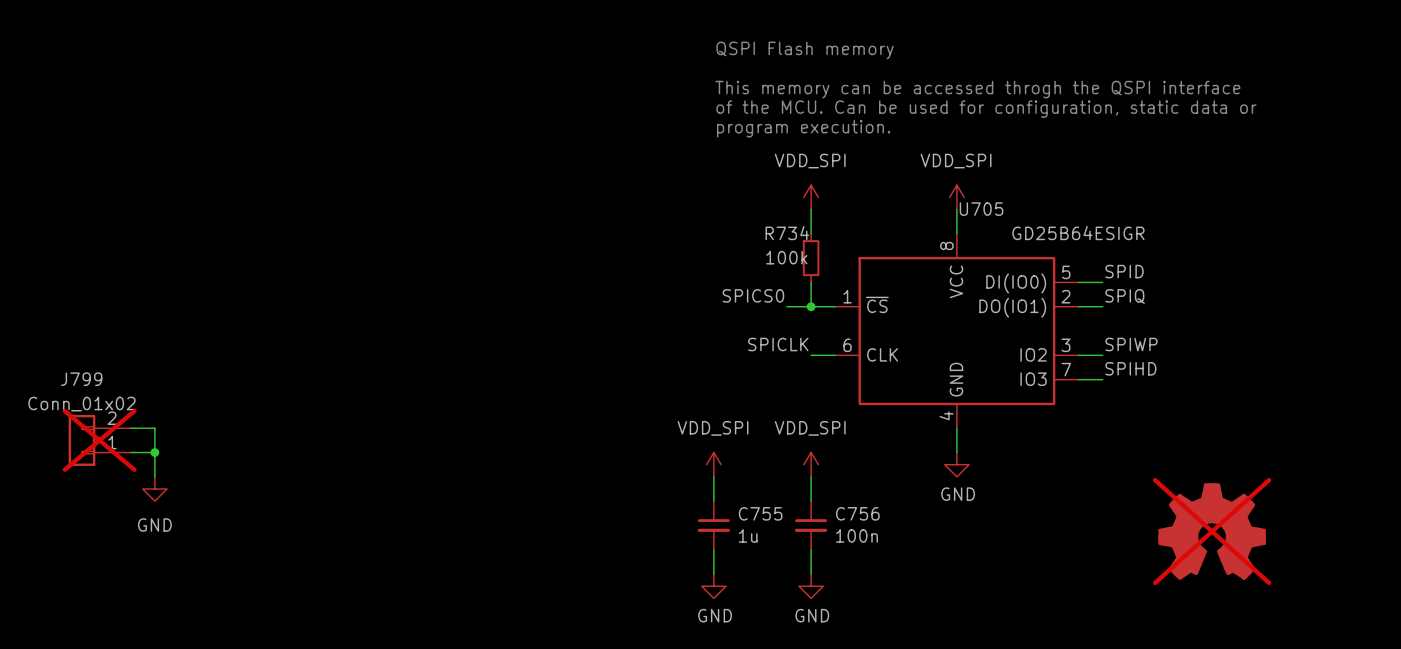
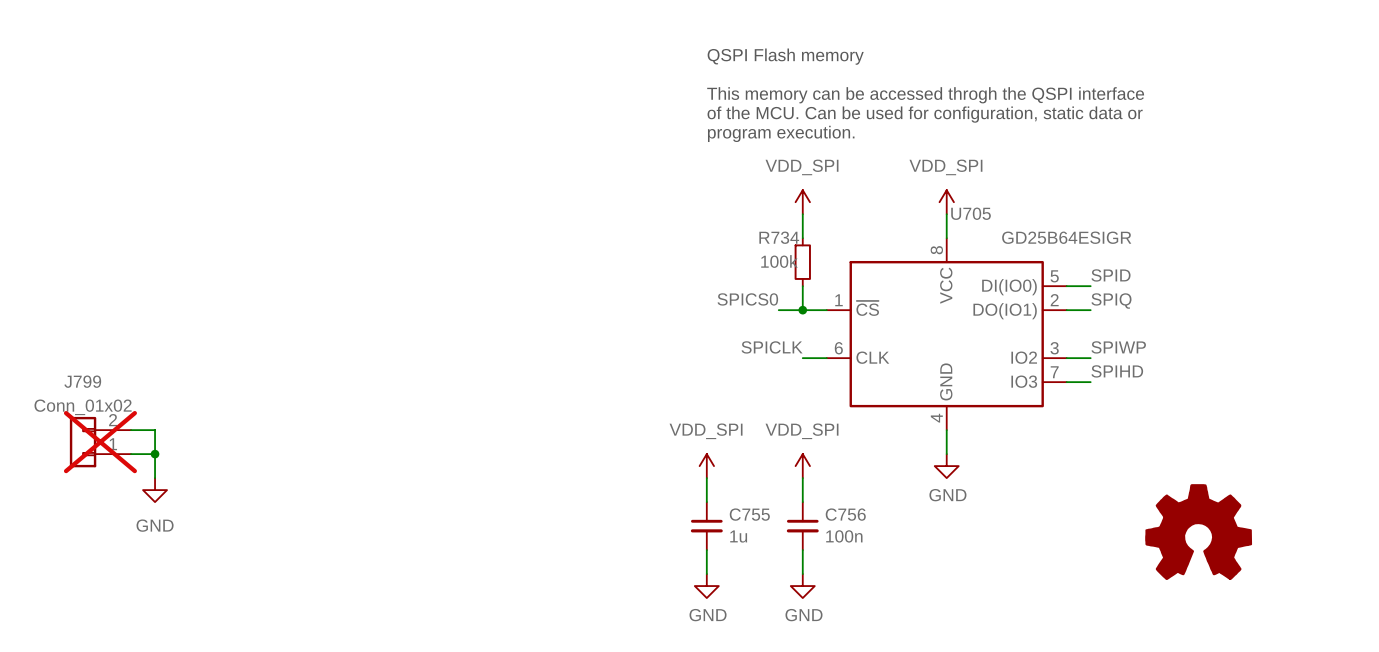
part do-not-place cross: (1212, 531) -> none

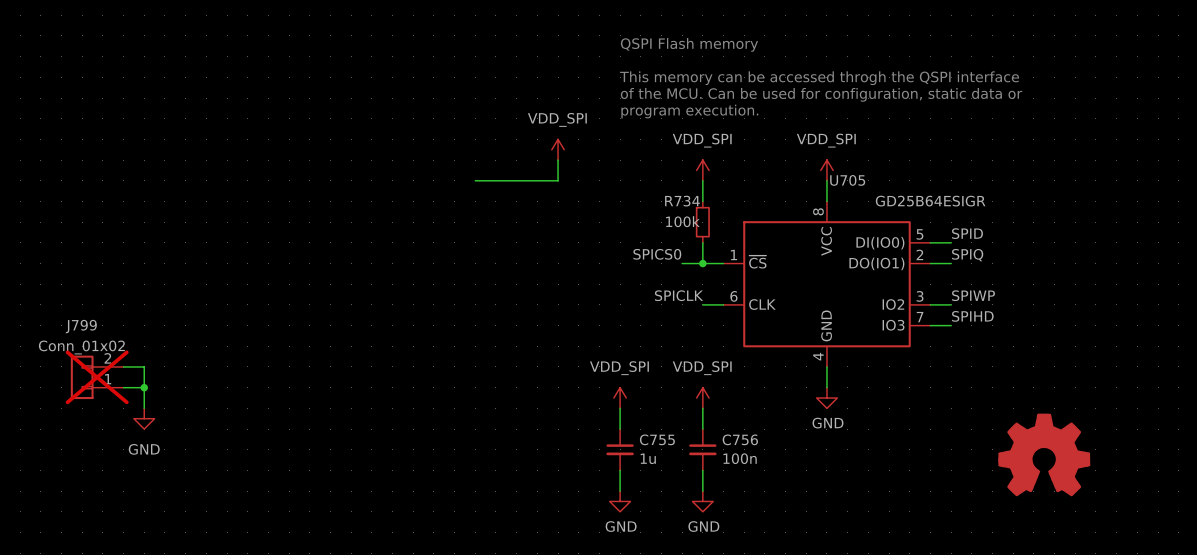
power symbol: none -> VDD_SPI (558, 149)
wire: none -> (558, 160) (558, 180) (475, 180)

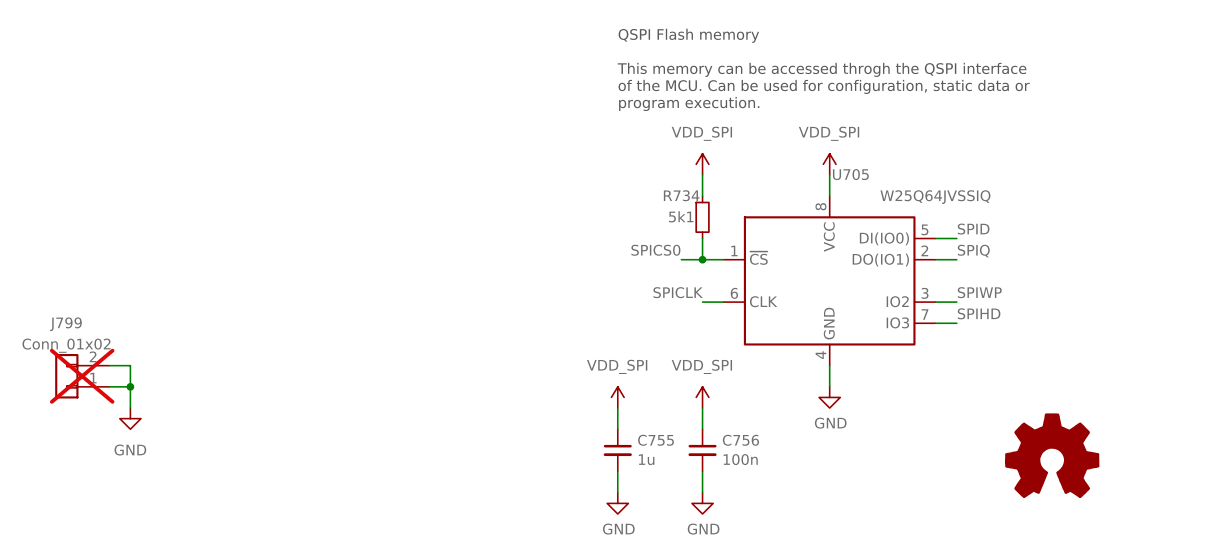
power symbol: VDD_SPI (558, 149) -> none
wire: (558, 160) (558, 180) (475, 180) -> none
U705 value: GD25B64ESIGR (930, 201) -> W25Q64JVSSIQ (935, 197)
R734 value: 100k (682, 221) -> 5k1 (681, 216)

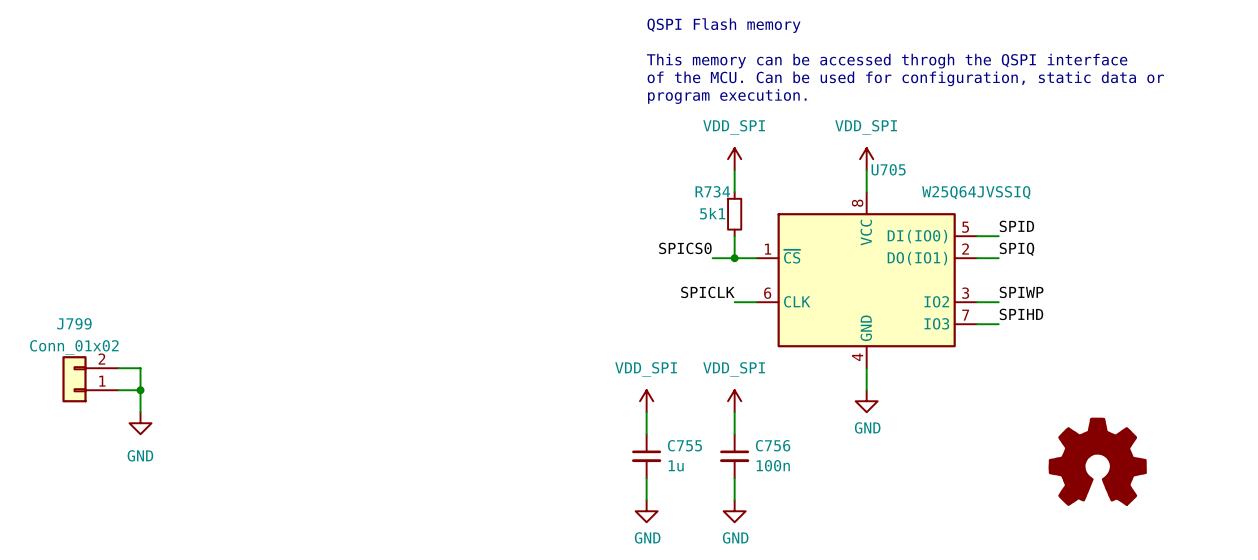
J799 do-not-place cross: (82, 376) -> none

